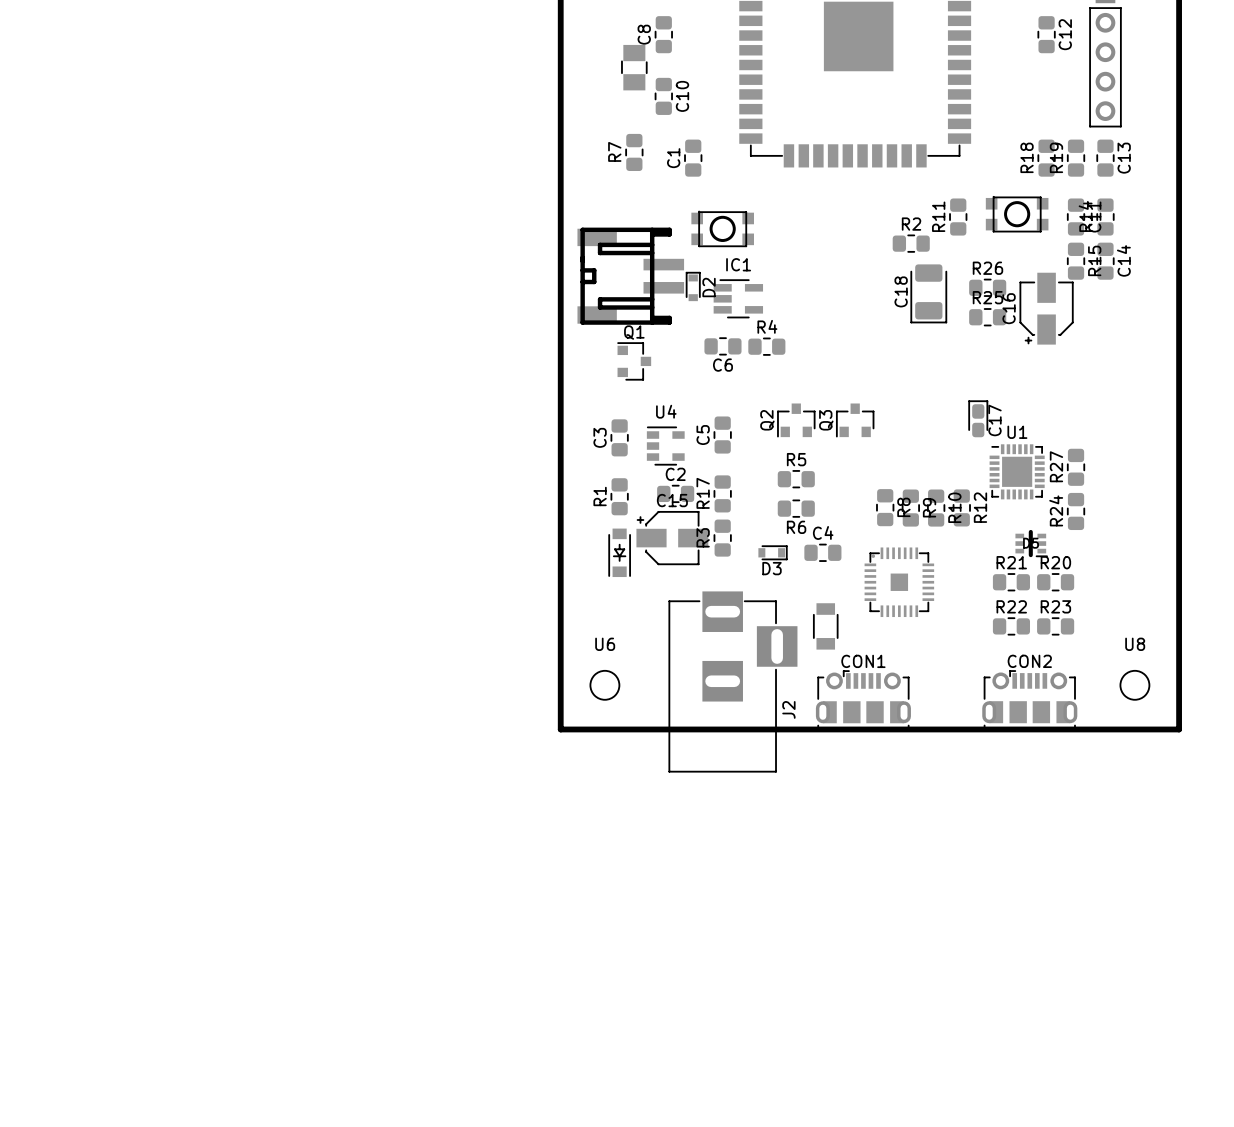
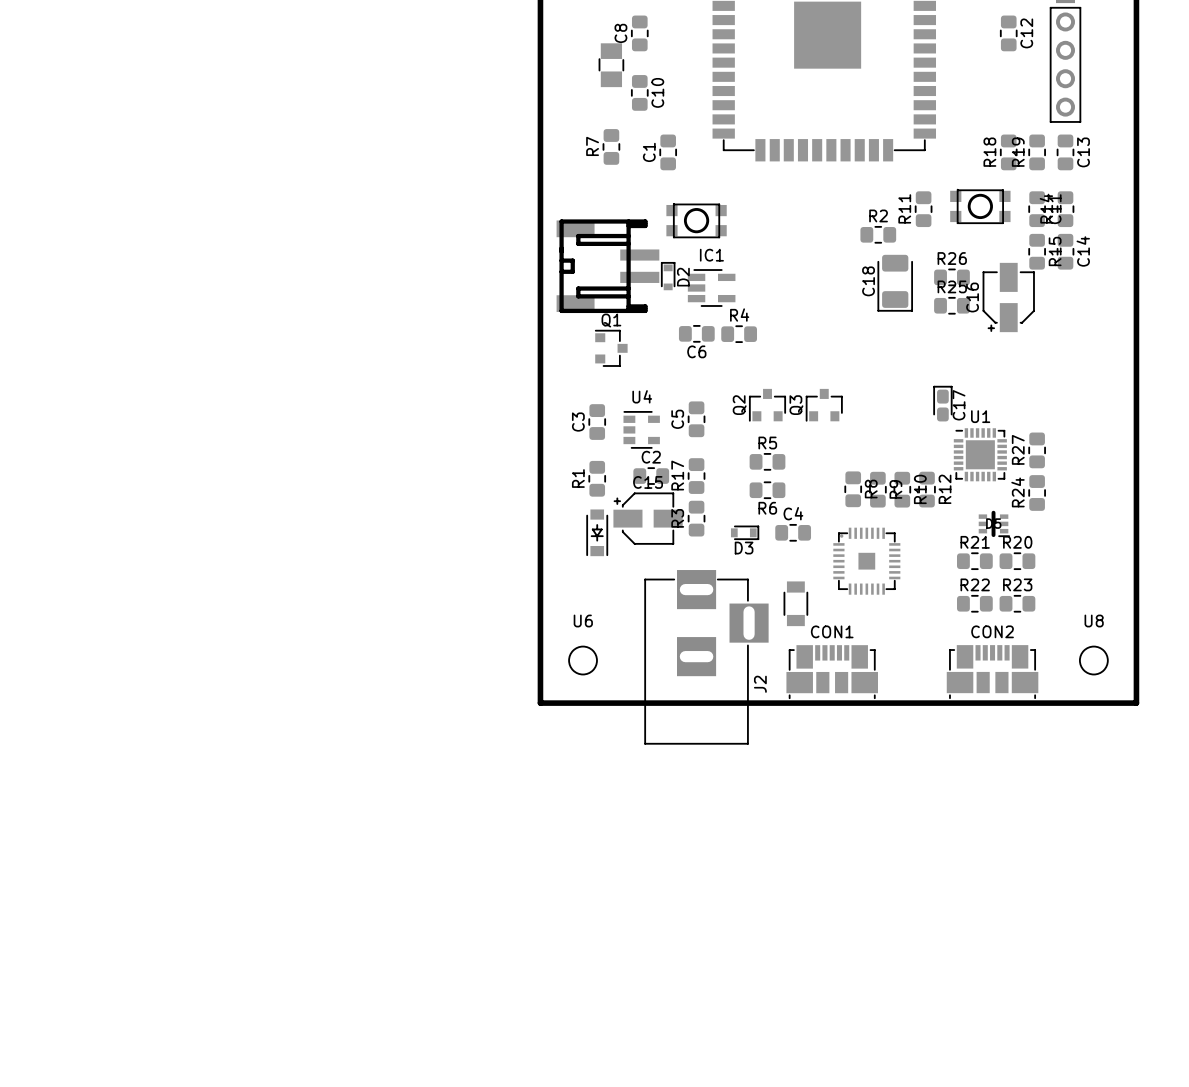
CON1 footprint: [815, 670, 911, 730] -> [786, 645, 878, 699]
CON2 footprint: [982, 670, 1078, 730] -> [946, 645, 1039, 699]

